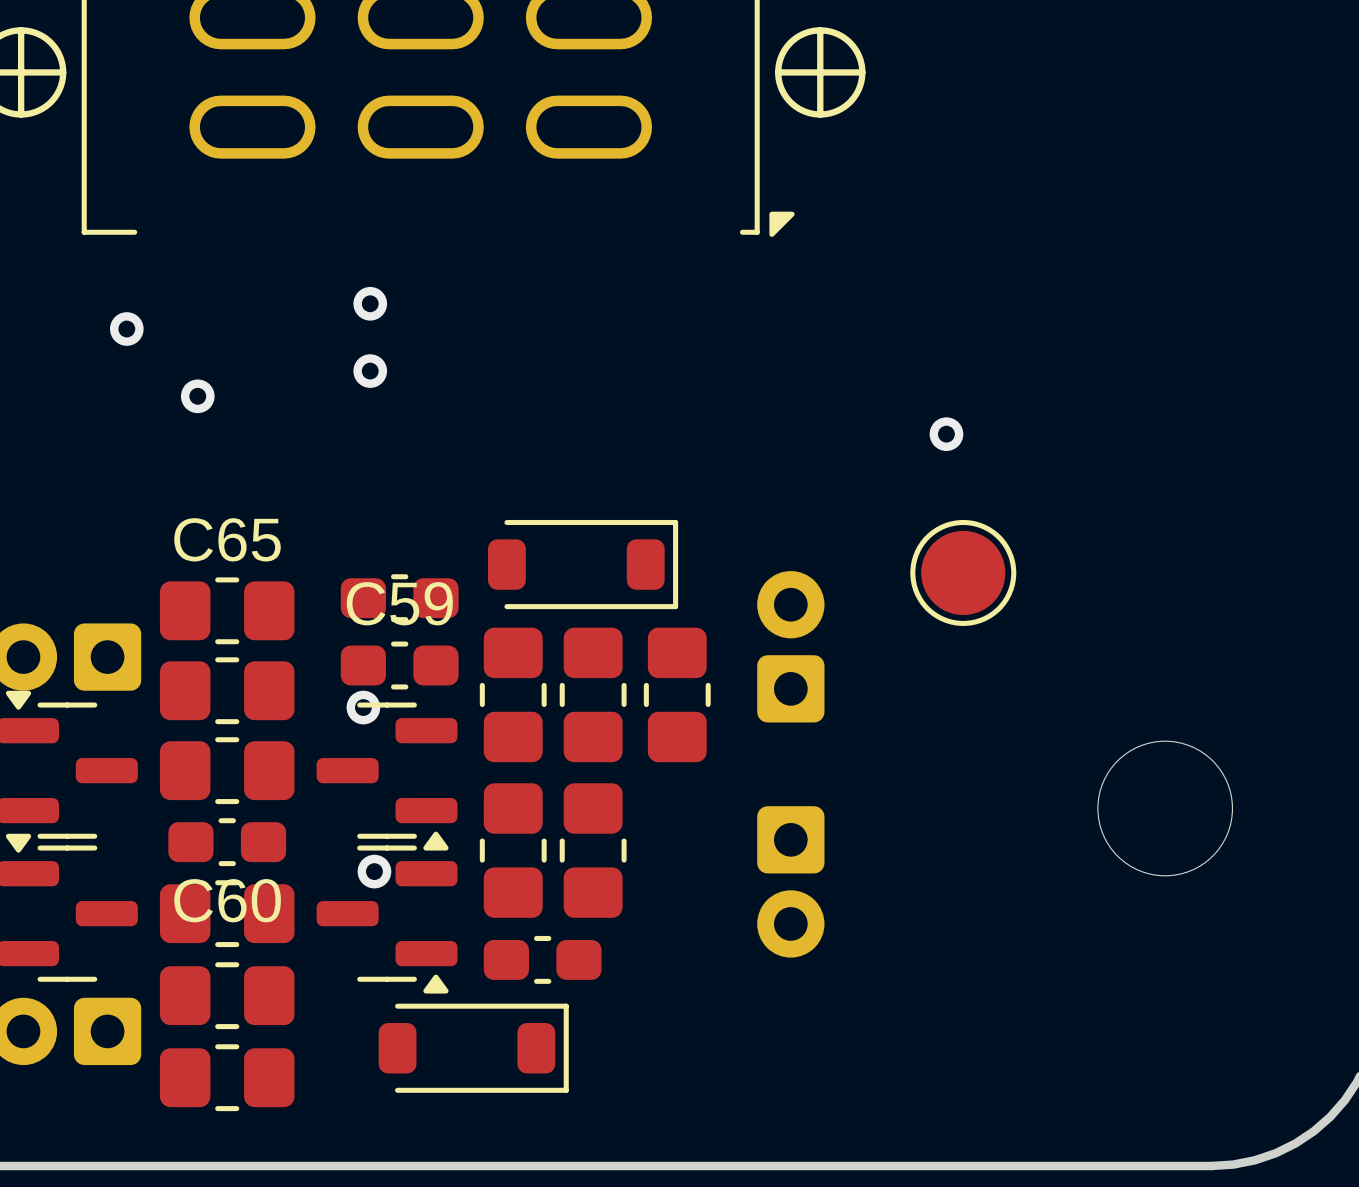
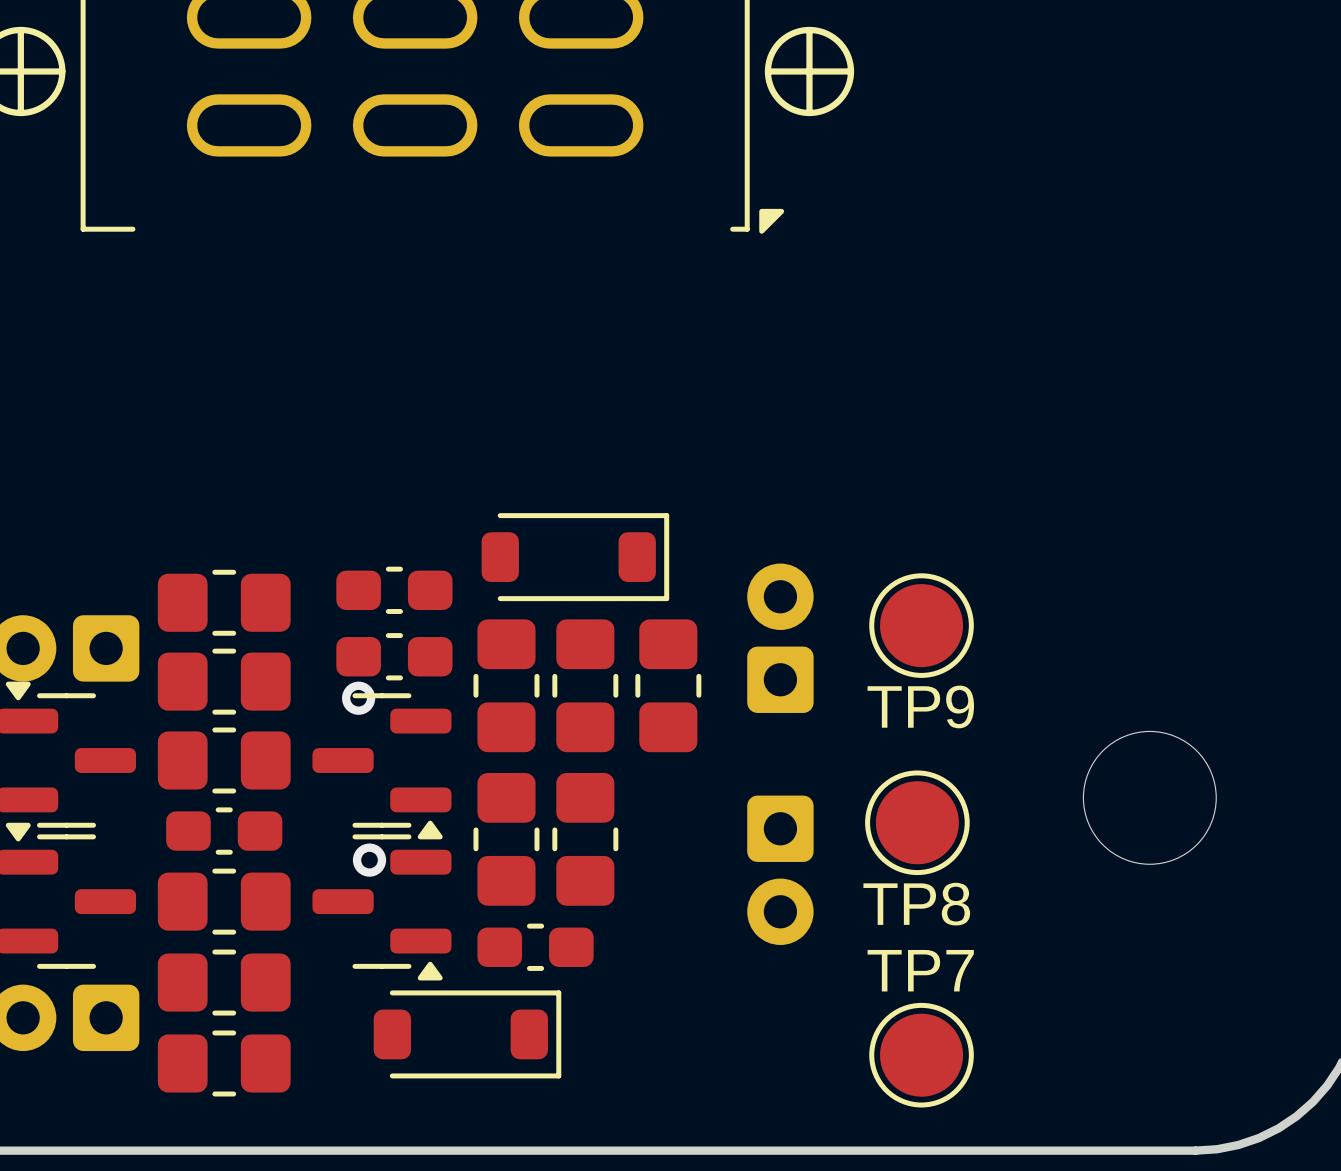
via: (370, 303) -> none
via: (126, 329) -> none
via: (370, 371) -> none
via: (197, 396) -> none
via: (946, 434) -> none
C65 name: C65 (227, 539) -> none
part: (963, 572) -> none
C59 name: C59 (399, 603) -> none
TP9: none -> (921, 625)
TP8: none -> (917, 822)
C60 name: C60 (227, 900) -> none
TP7: none -> (921, 1055)

